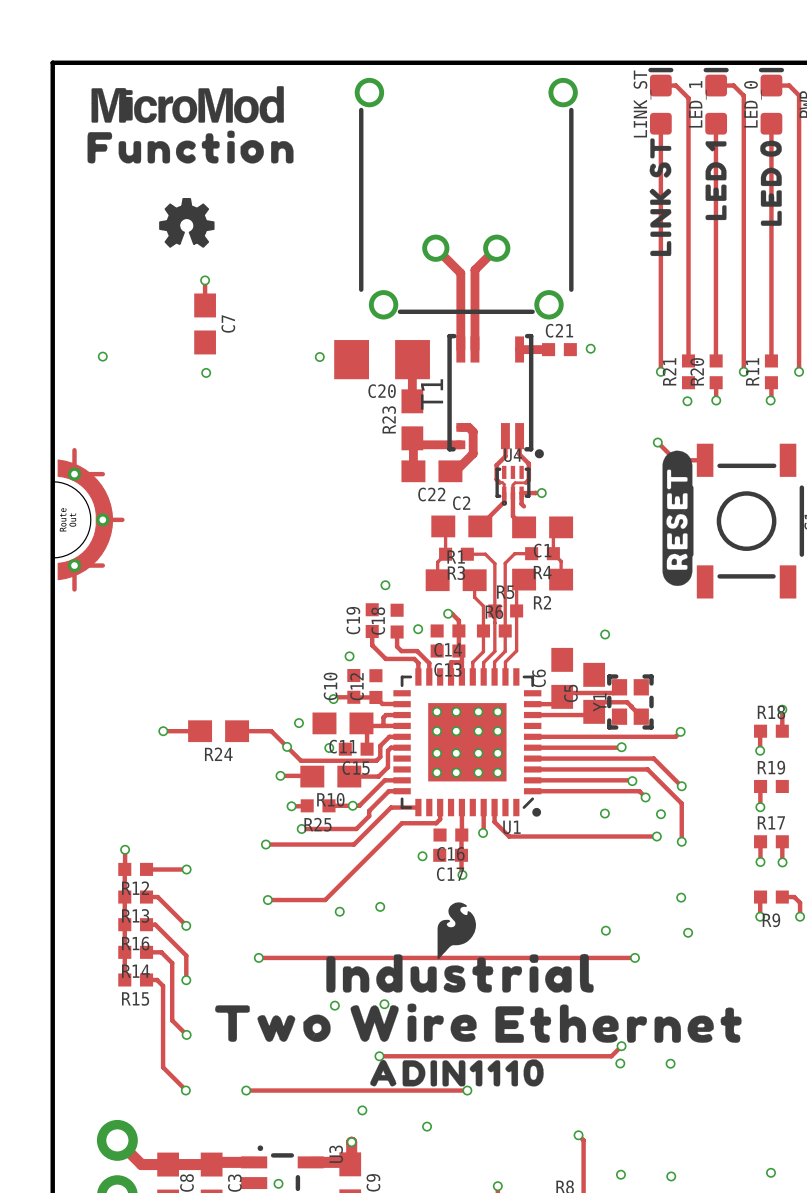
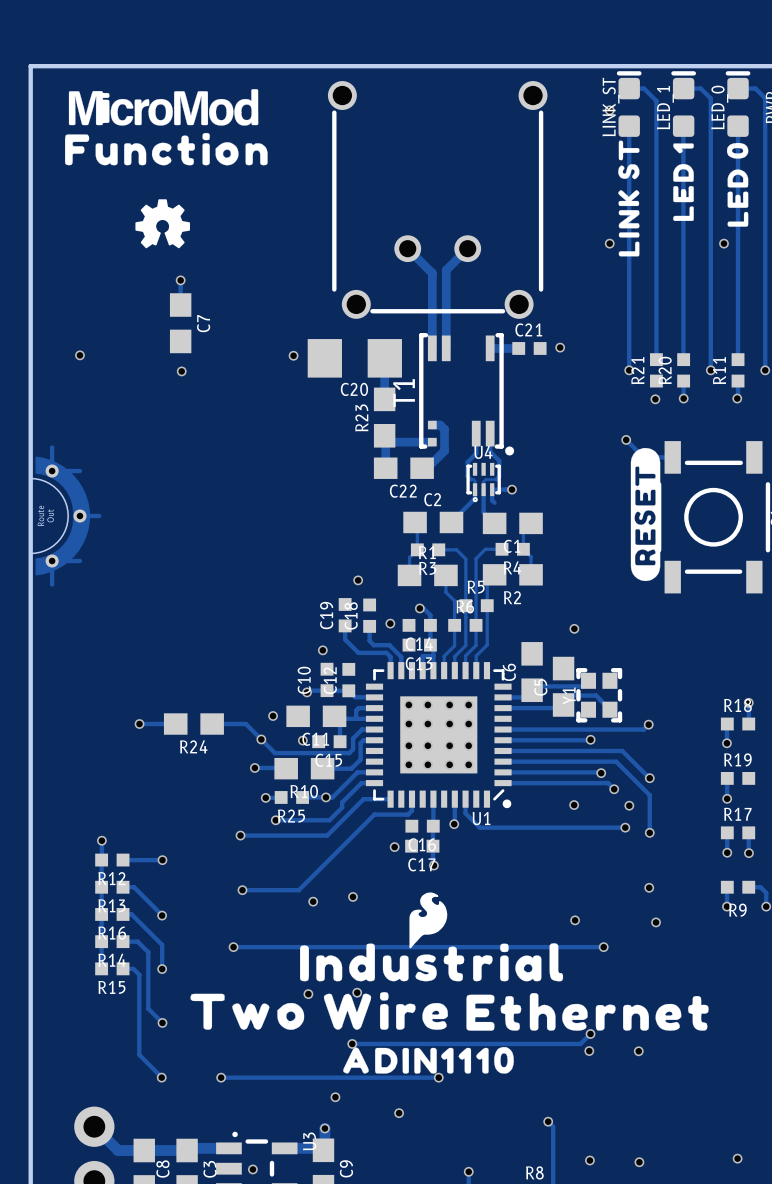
via: none -> (609, 110)
via: none -> (609, 243)
via: none -> (723, 243)

